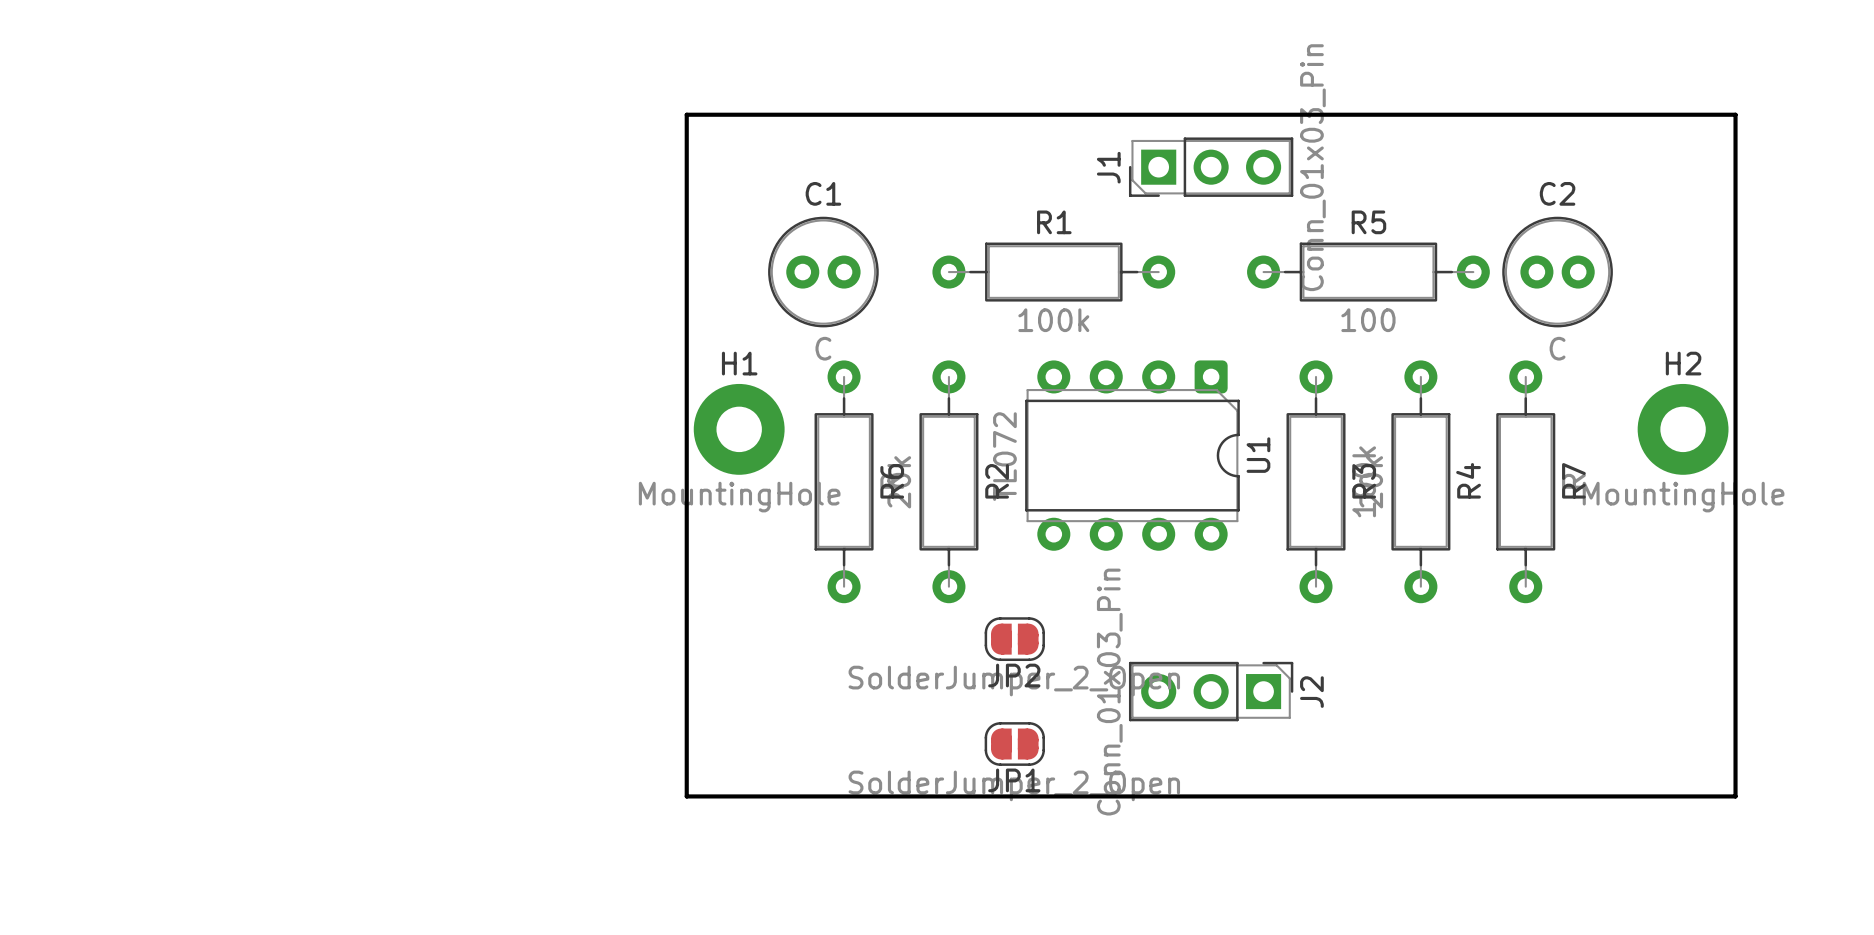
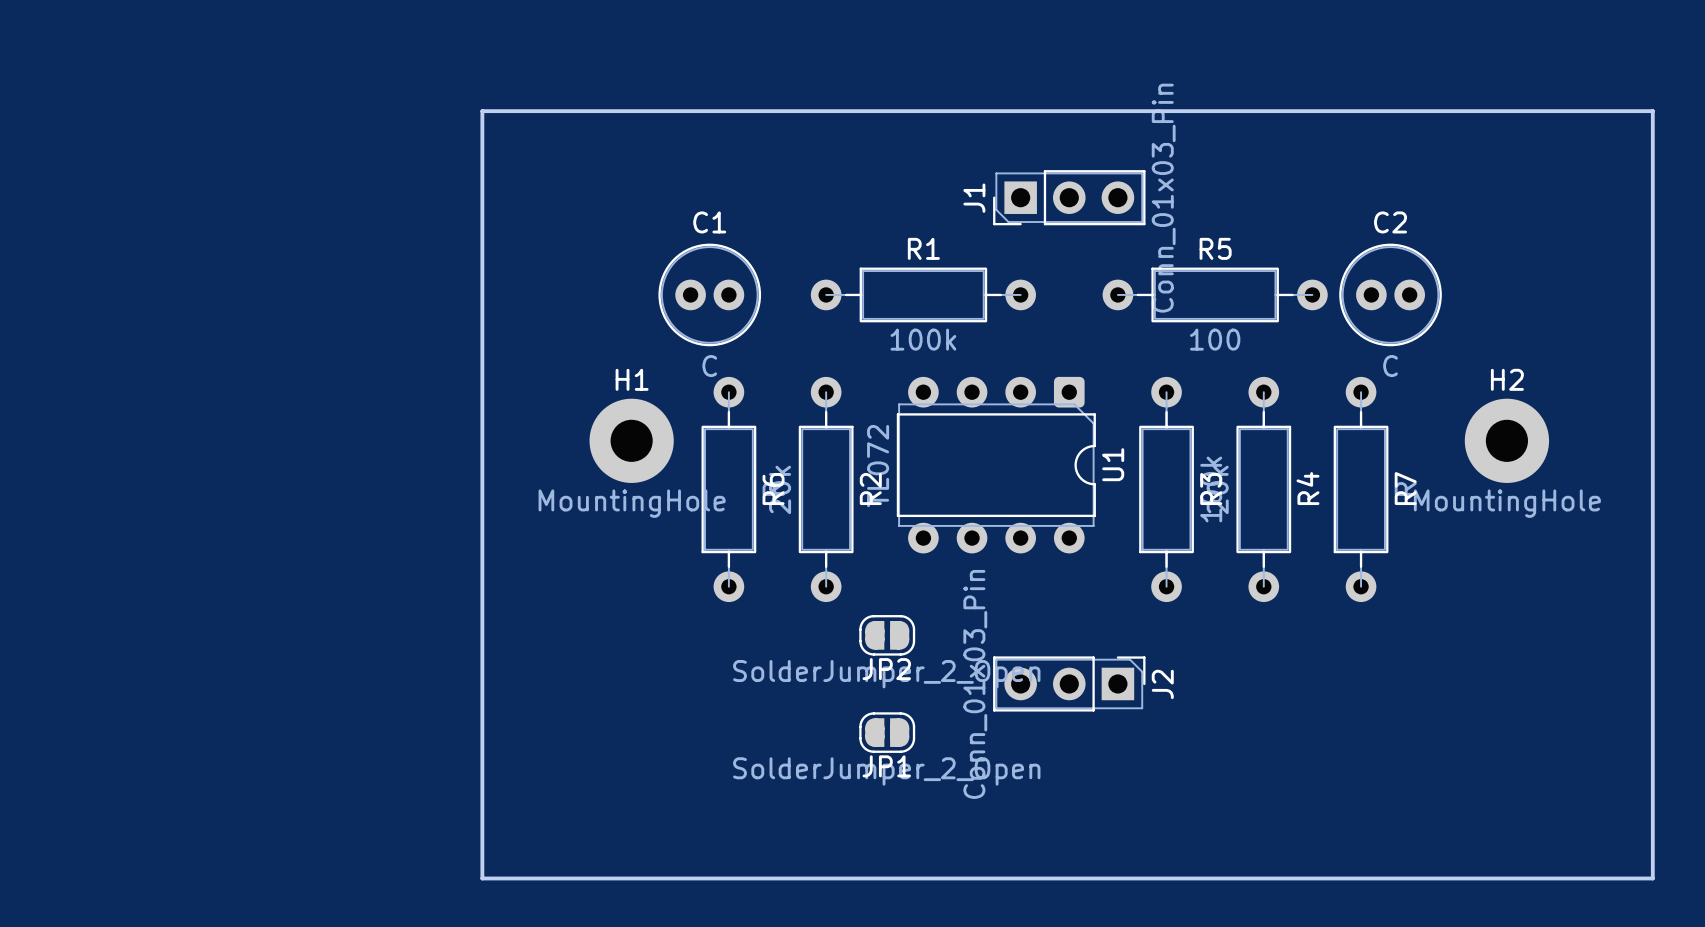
board edge: (686, 114) (1735, 114) (1735, 796) (686, 796) (686, 114) -> (482, 111) (482, 878) (1652, 878) (1652, 111) (482, 111)

